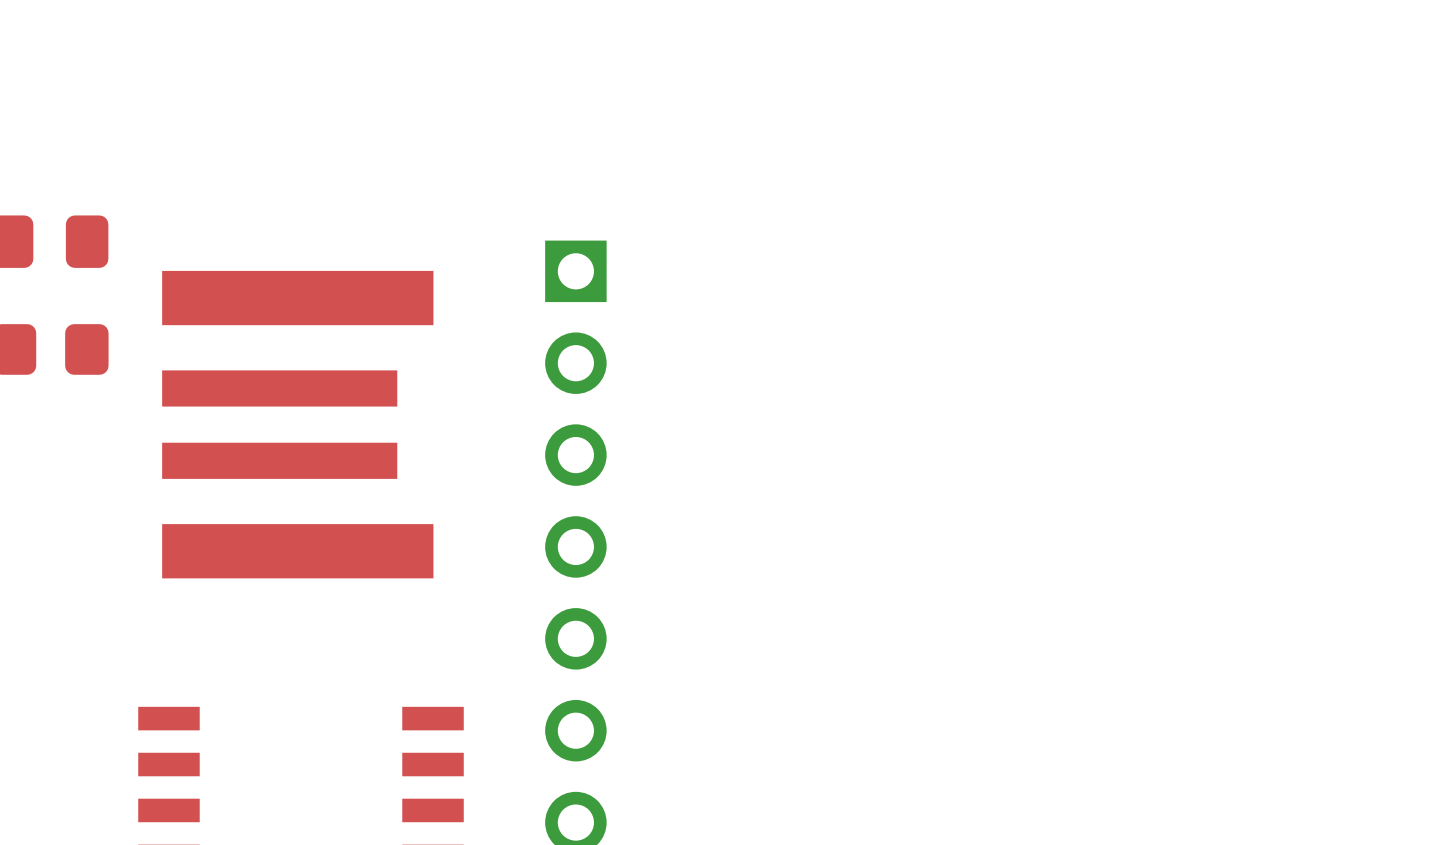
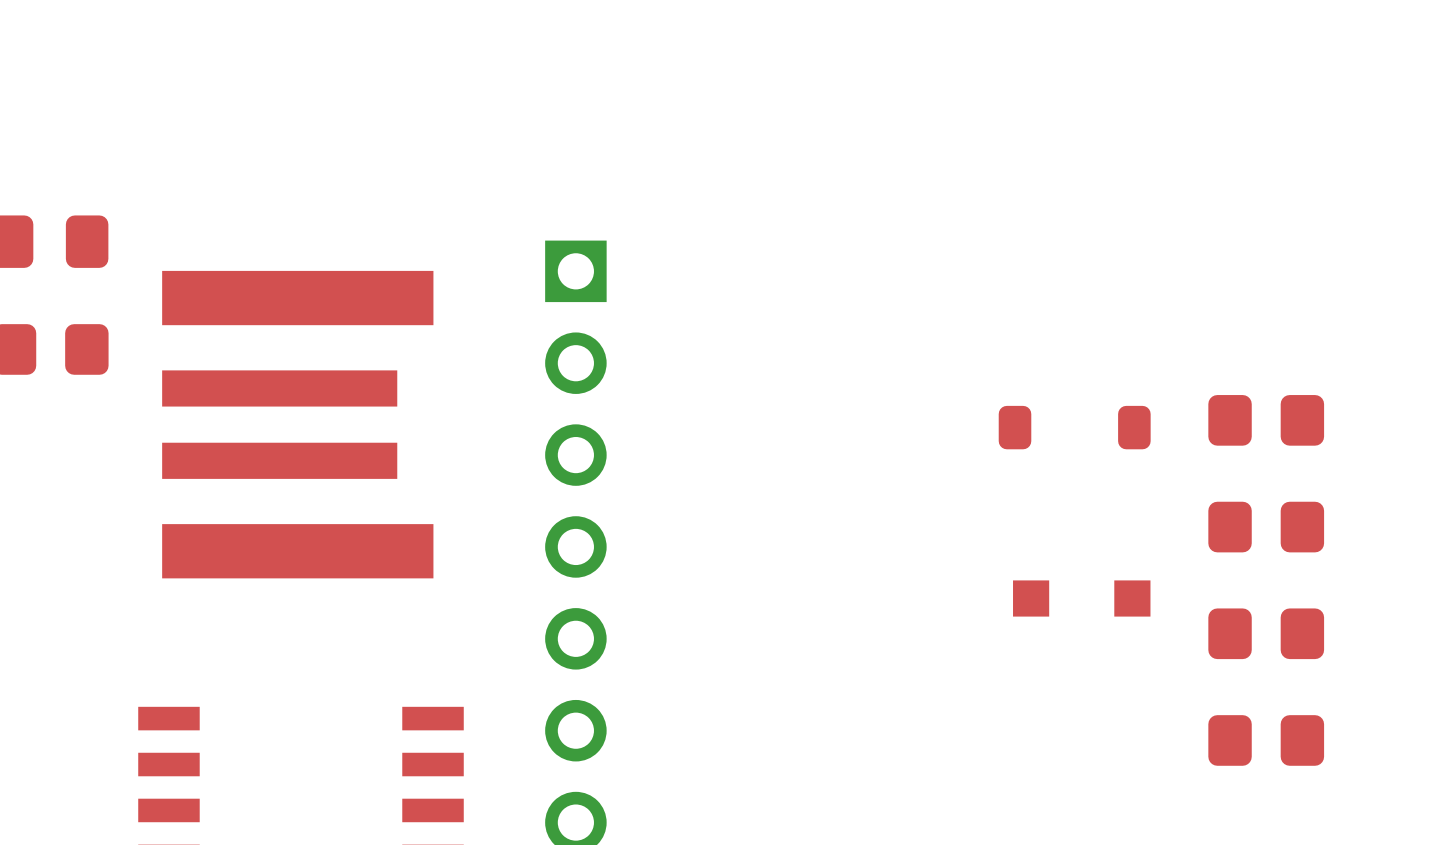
part: none -> (1266, 420)
part: none -> (1074, 427)
part: none -> (1266, 527)
part: none -> (1081, 598)
part: none -> (1266, 633)
part: none -> (1266, 740)

